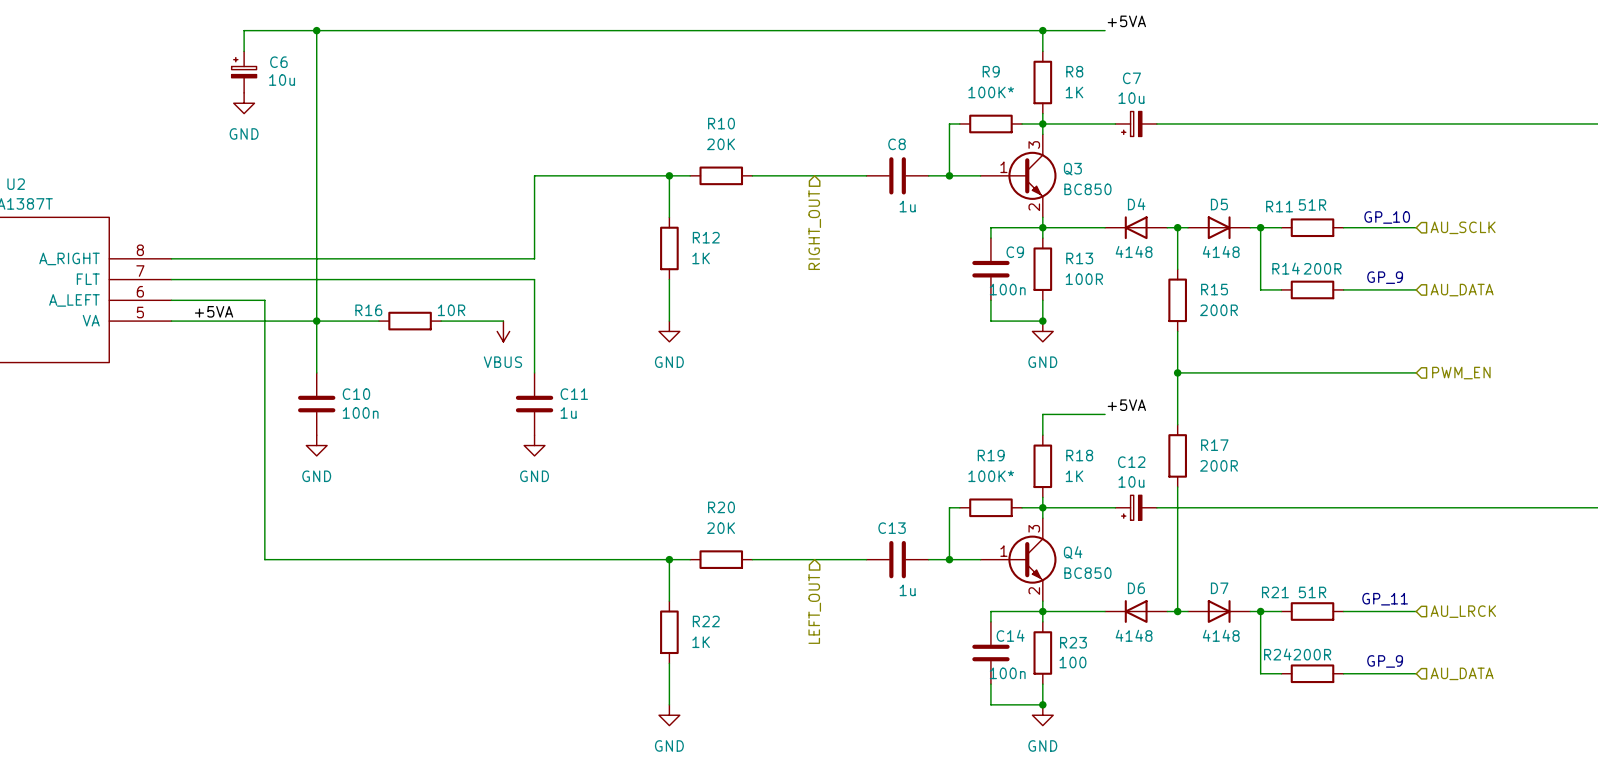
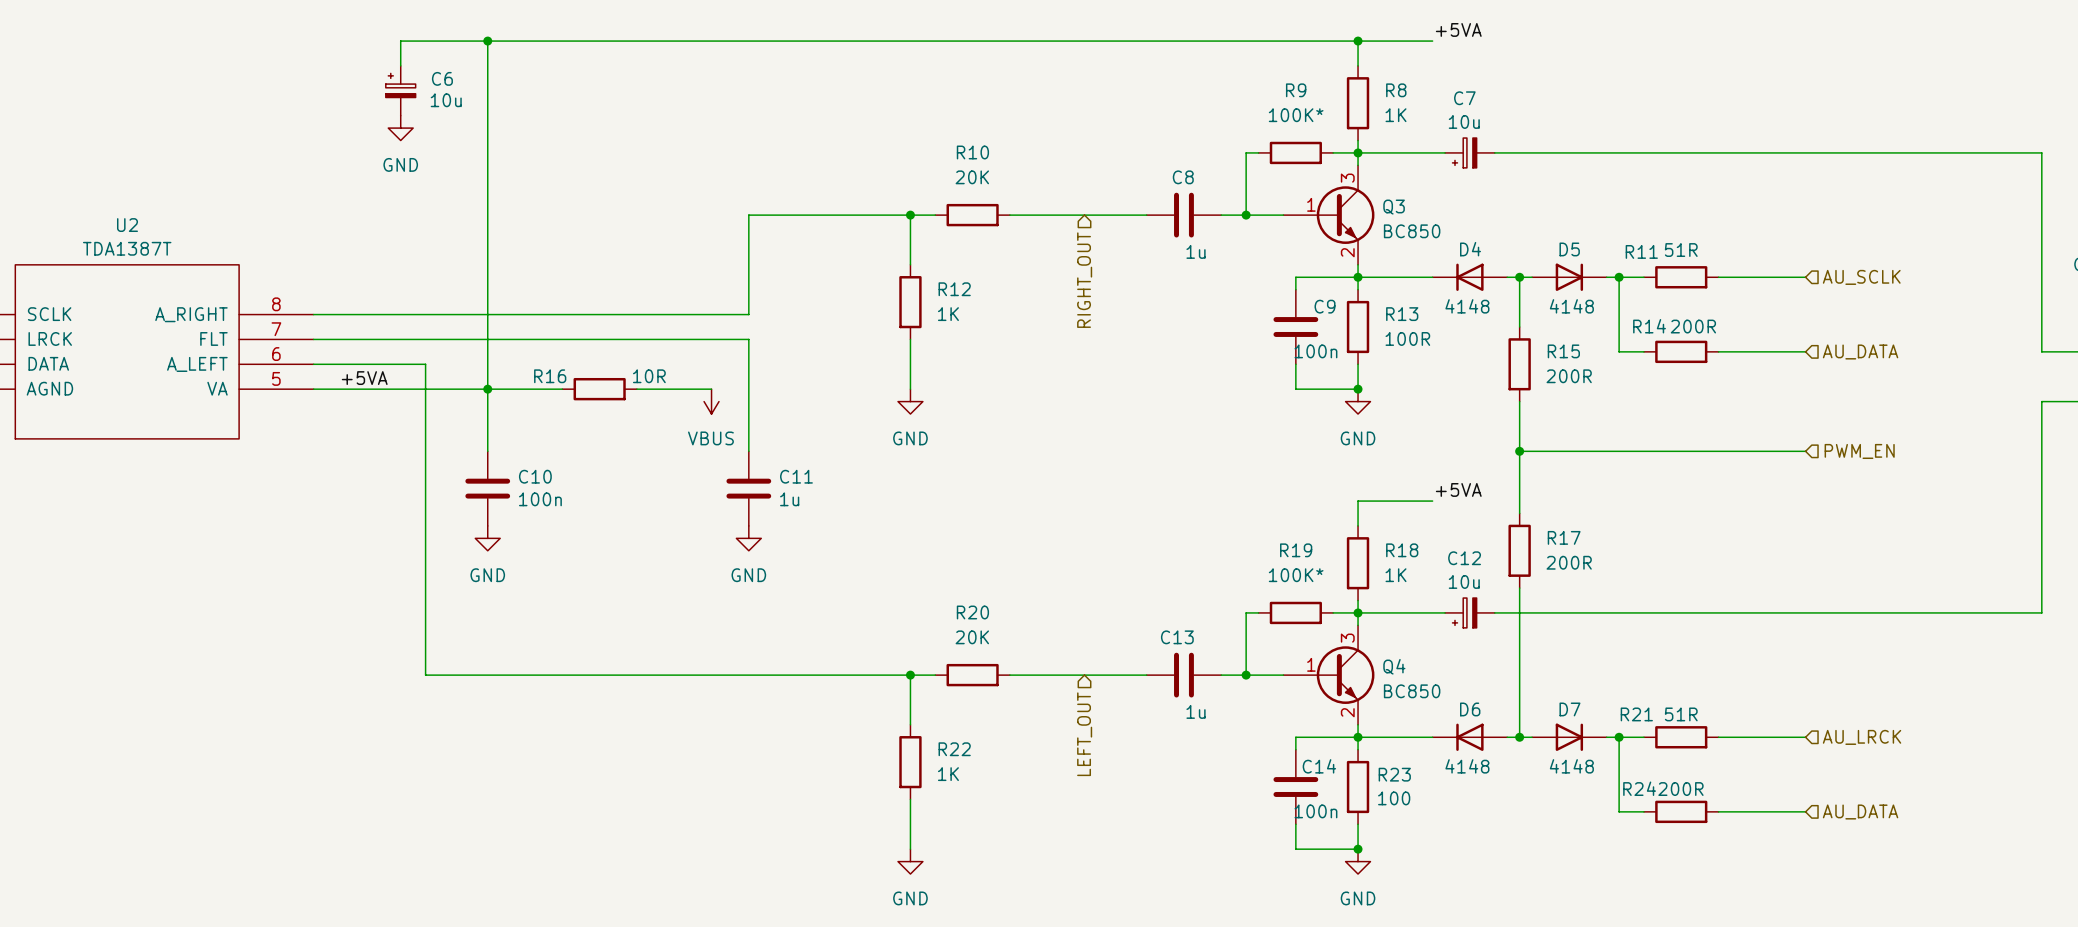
text: GP_10 (1387, 217) -> none
text: GP_9 (1385, 277) -> none
text: GP_11 (1385, 599) -> none
text: GP_9 (1385, 661) -> none

